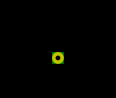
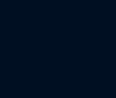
part: (57, 57) -> none

